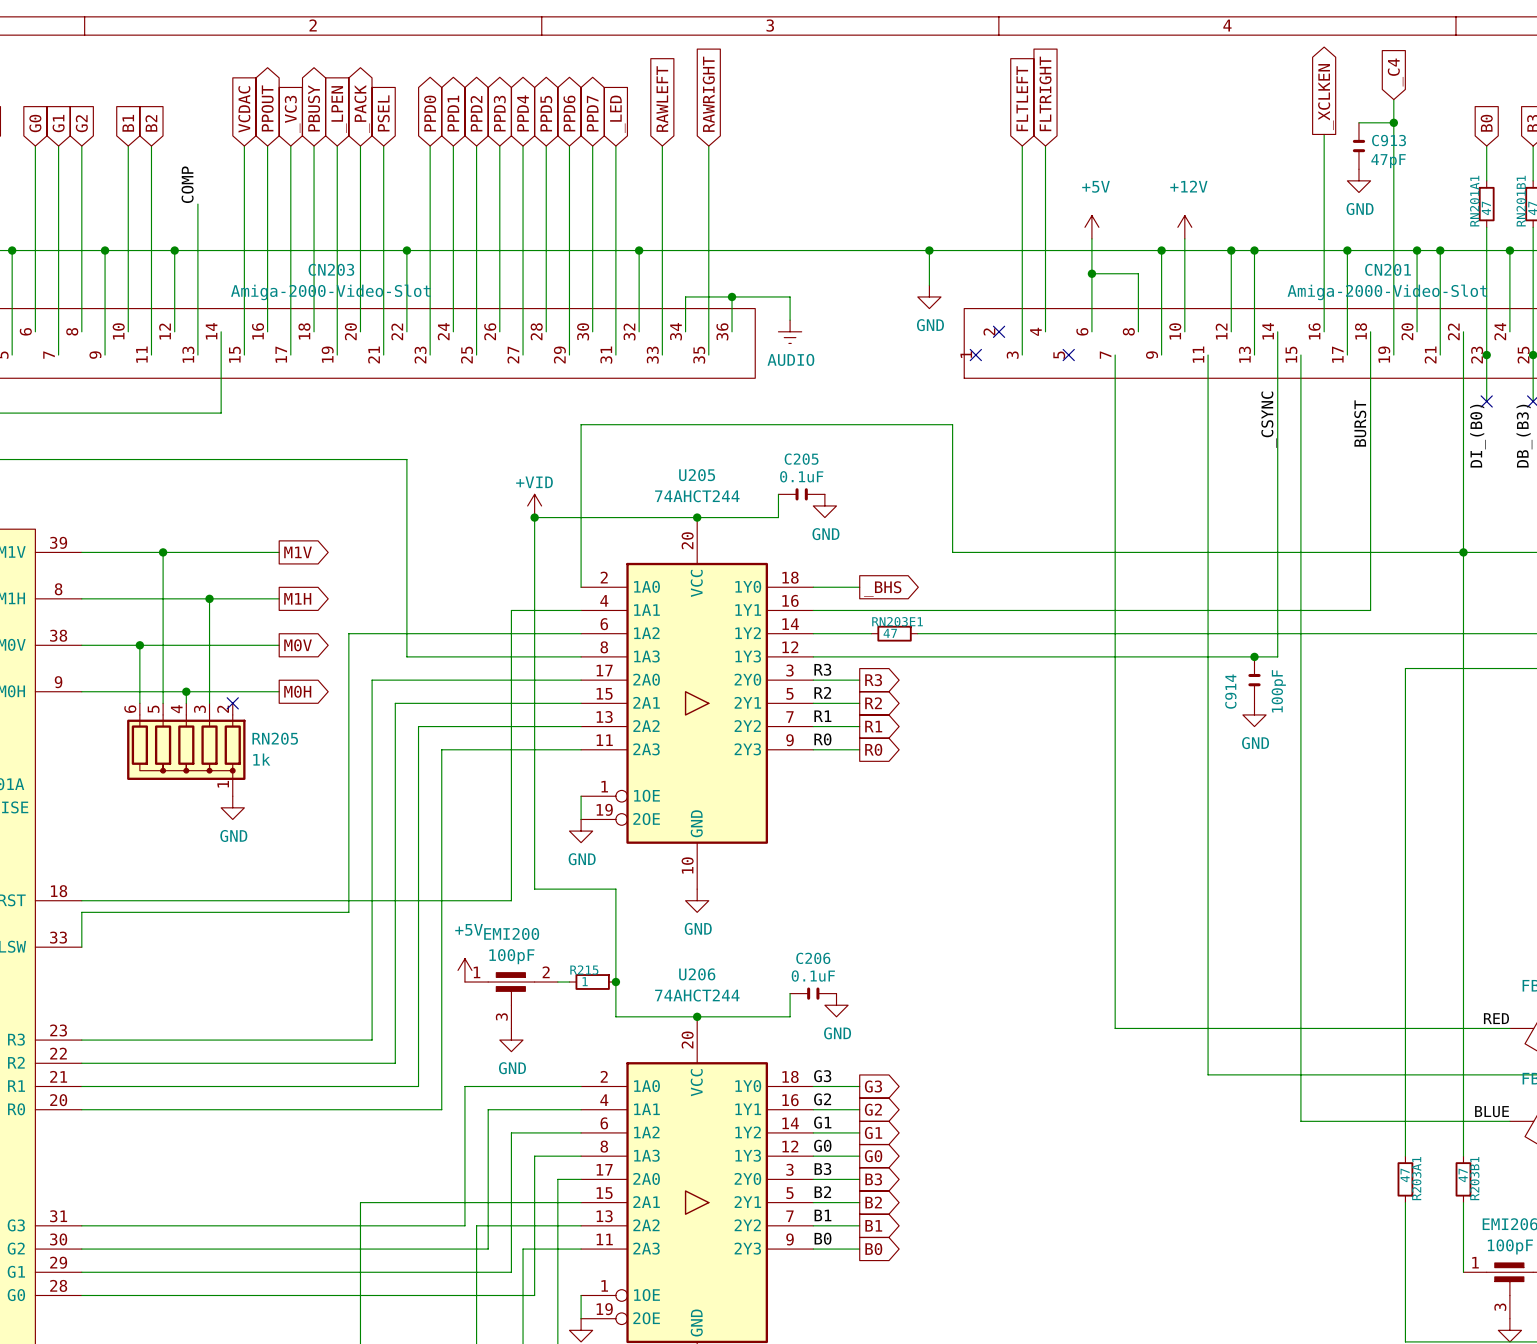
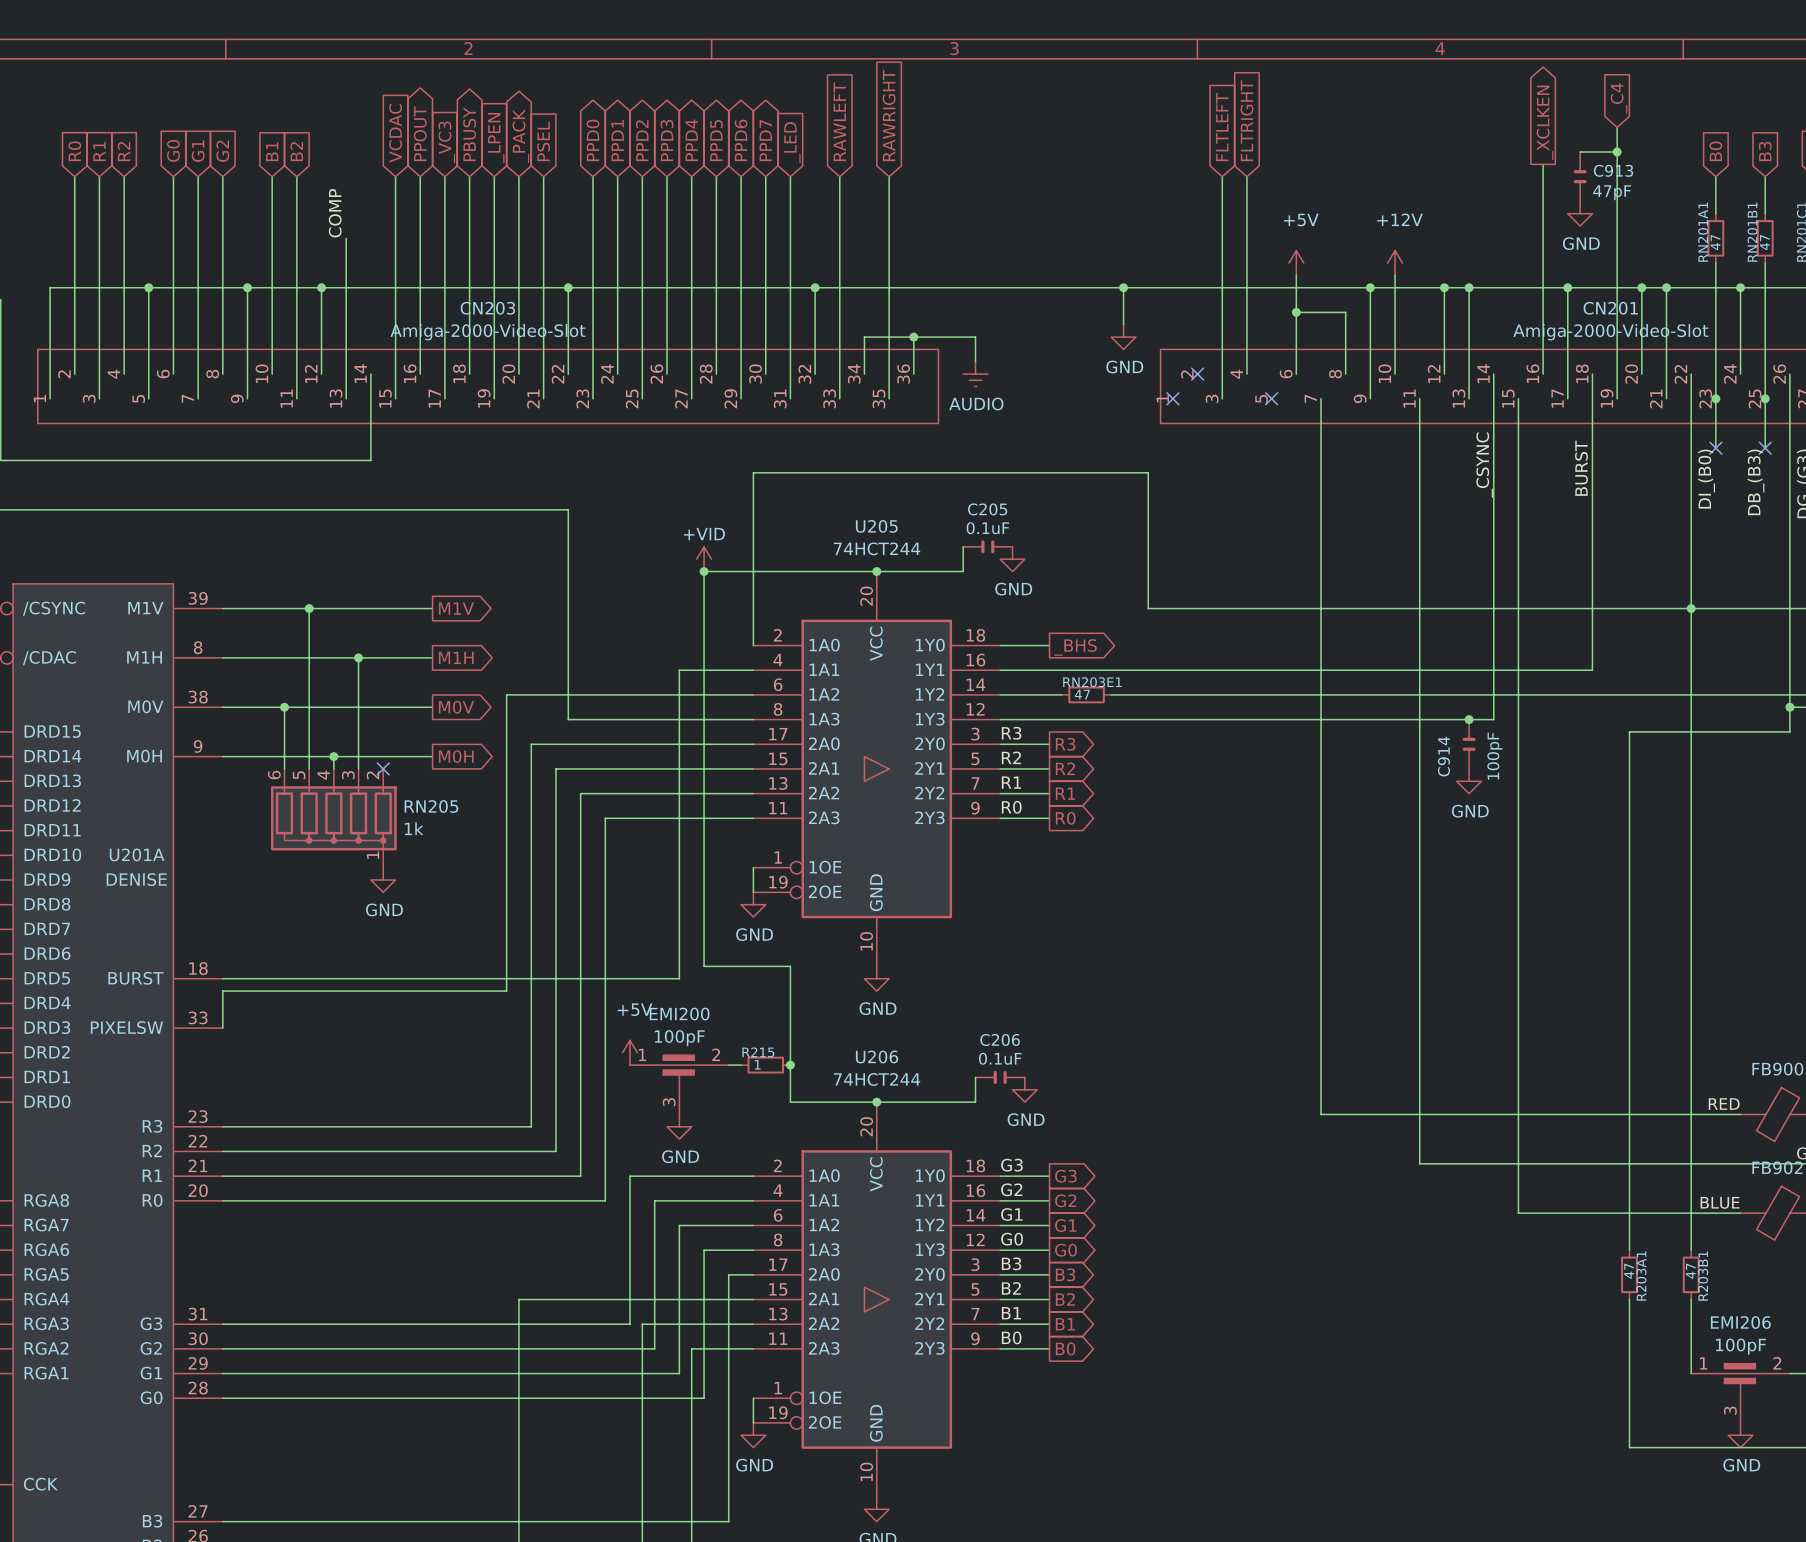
U205 value: 74AHCT244 (697, 496) -> 74HCT244 (877, 548)
U206 value: 74AHCT244 (697, 995) -> 74HCT244 (877, 1079)

